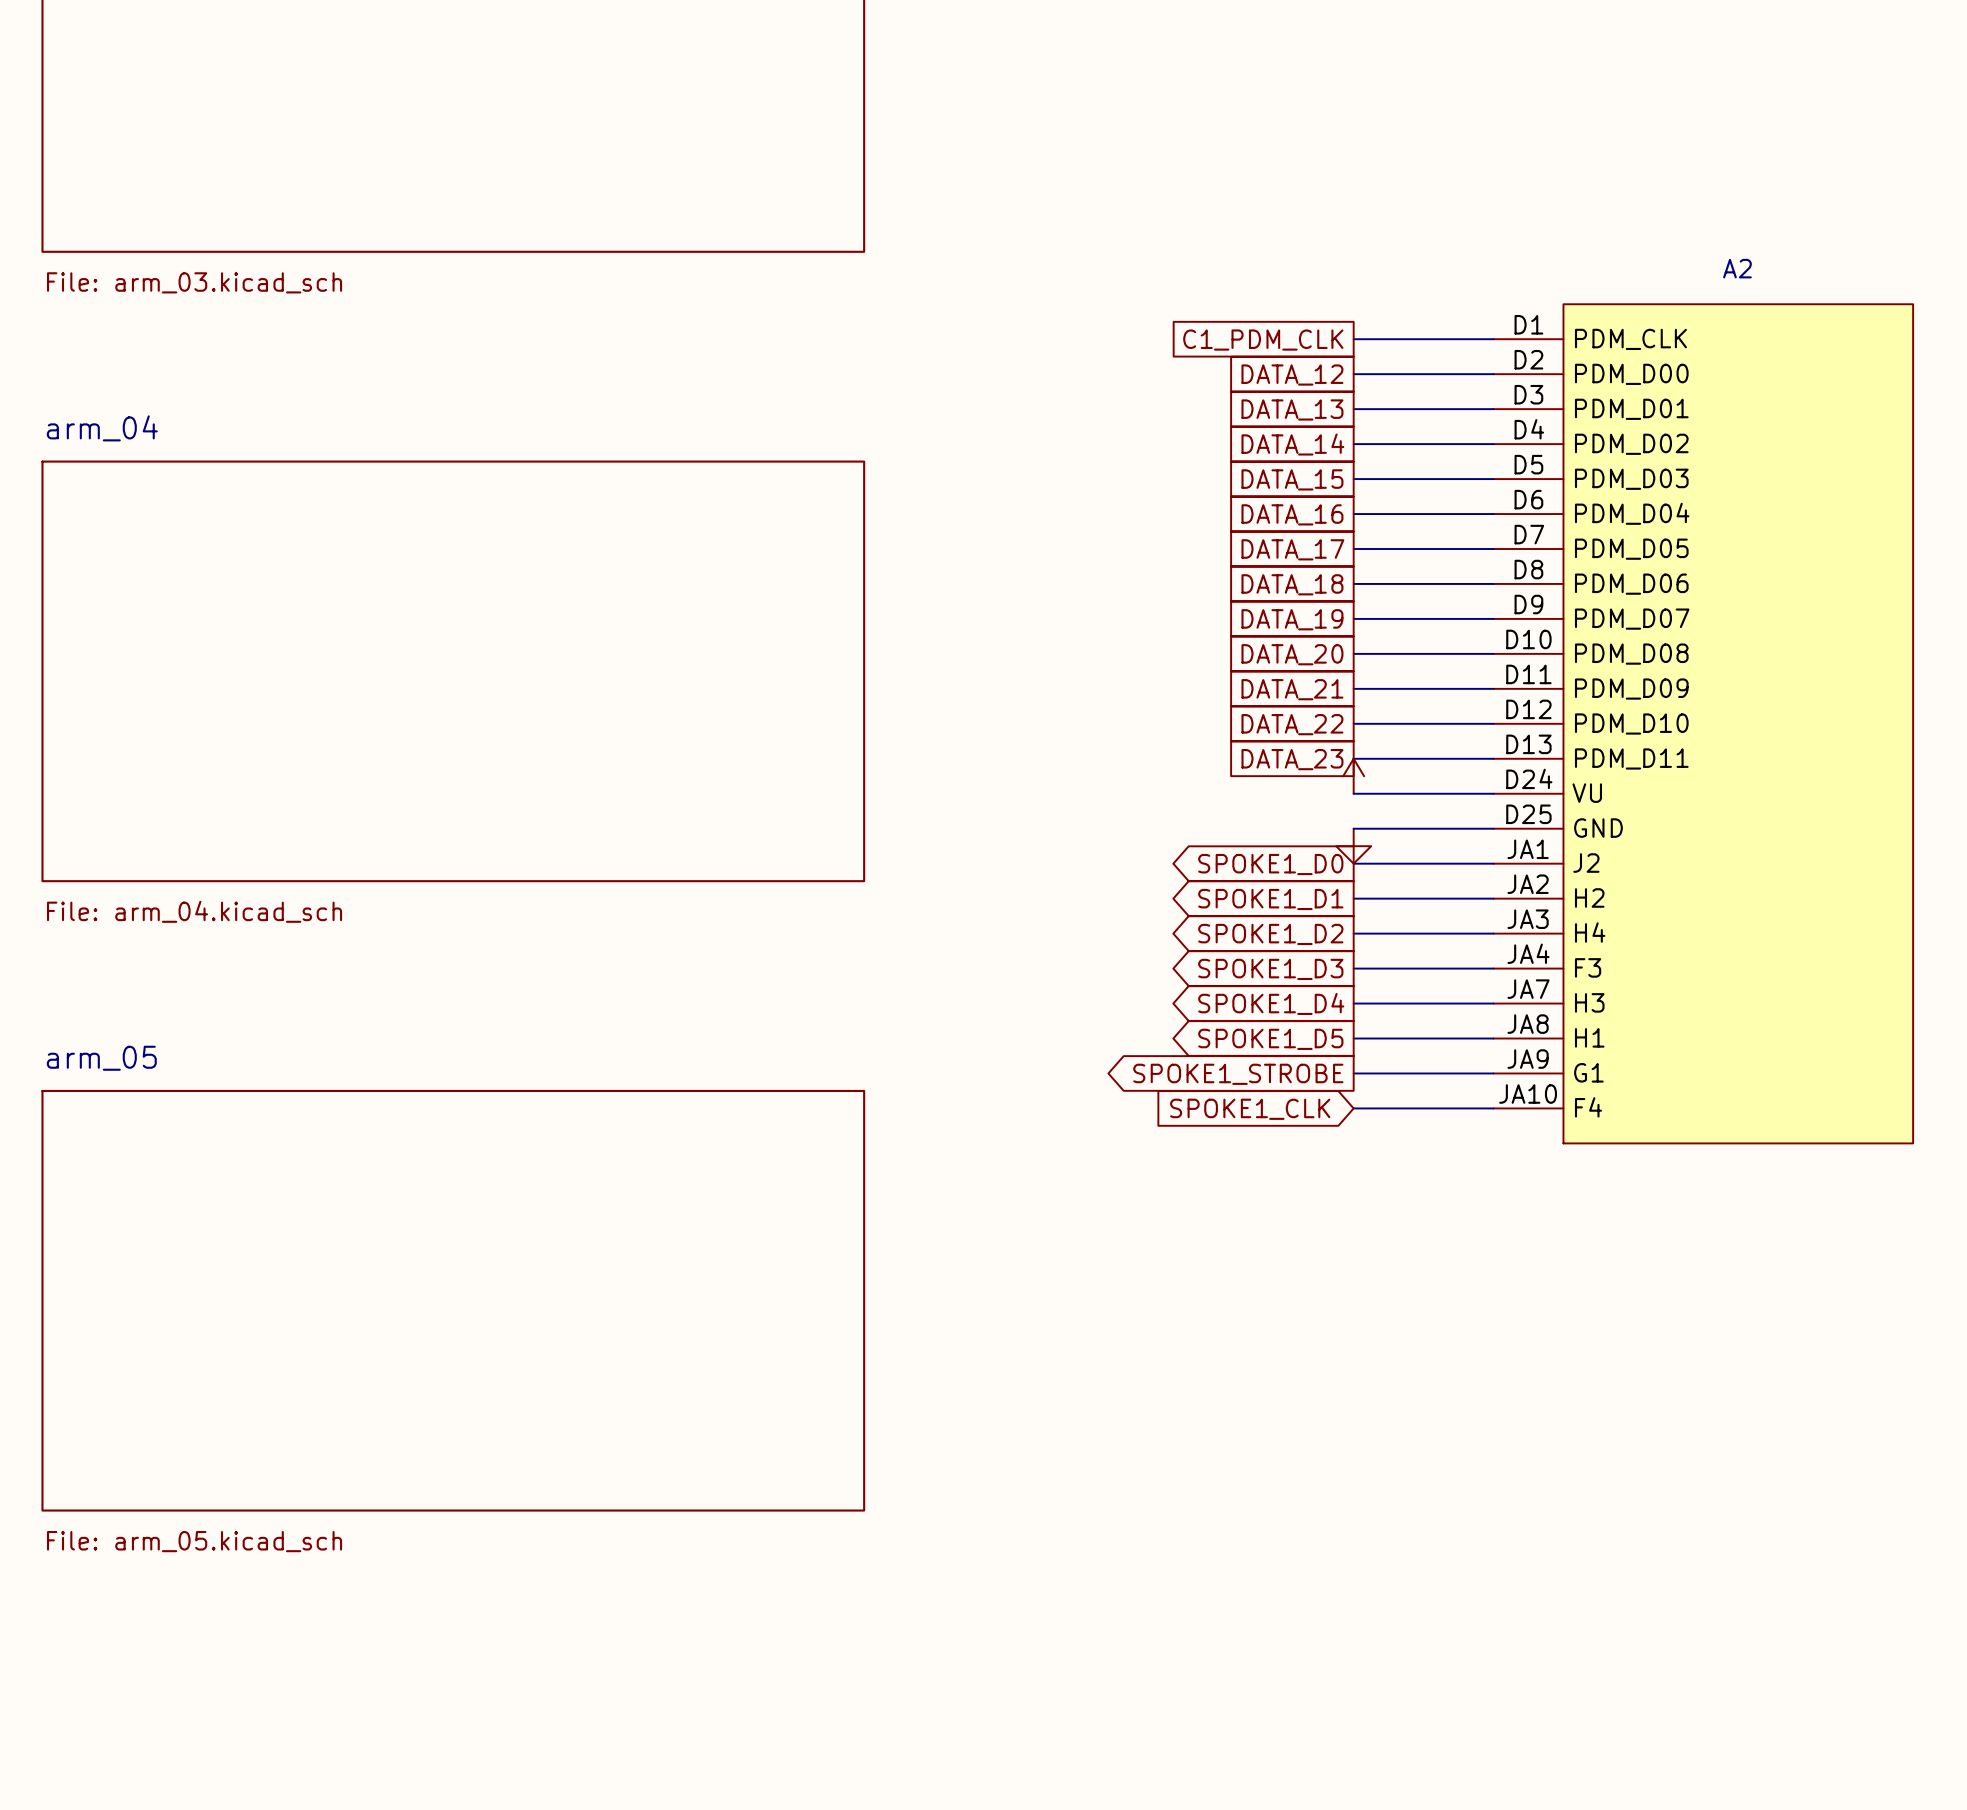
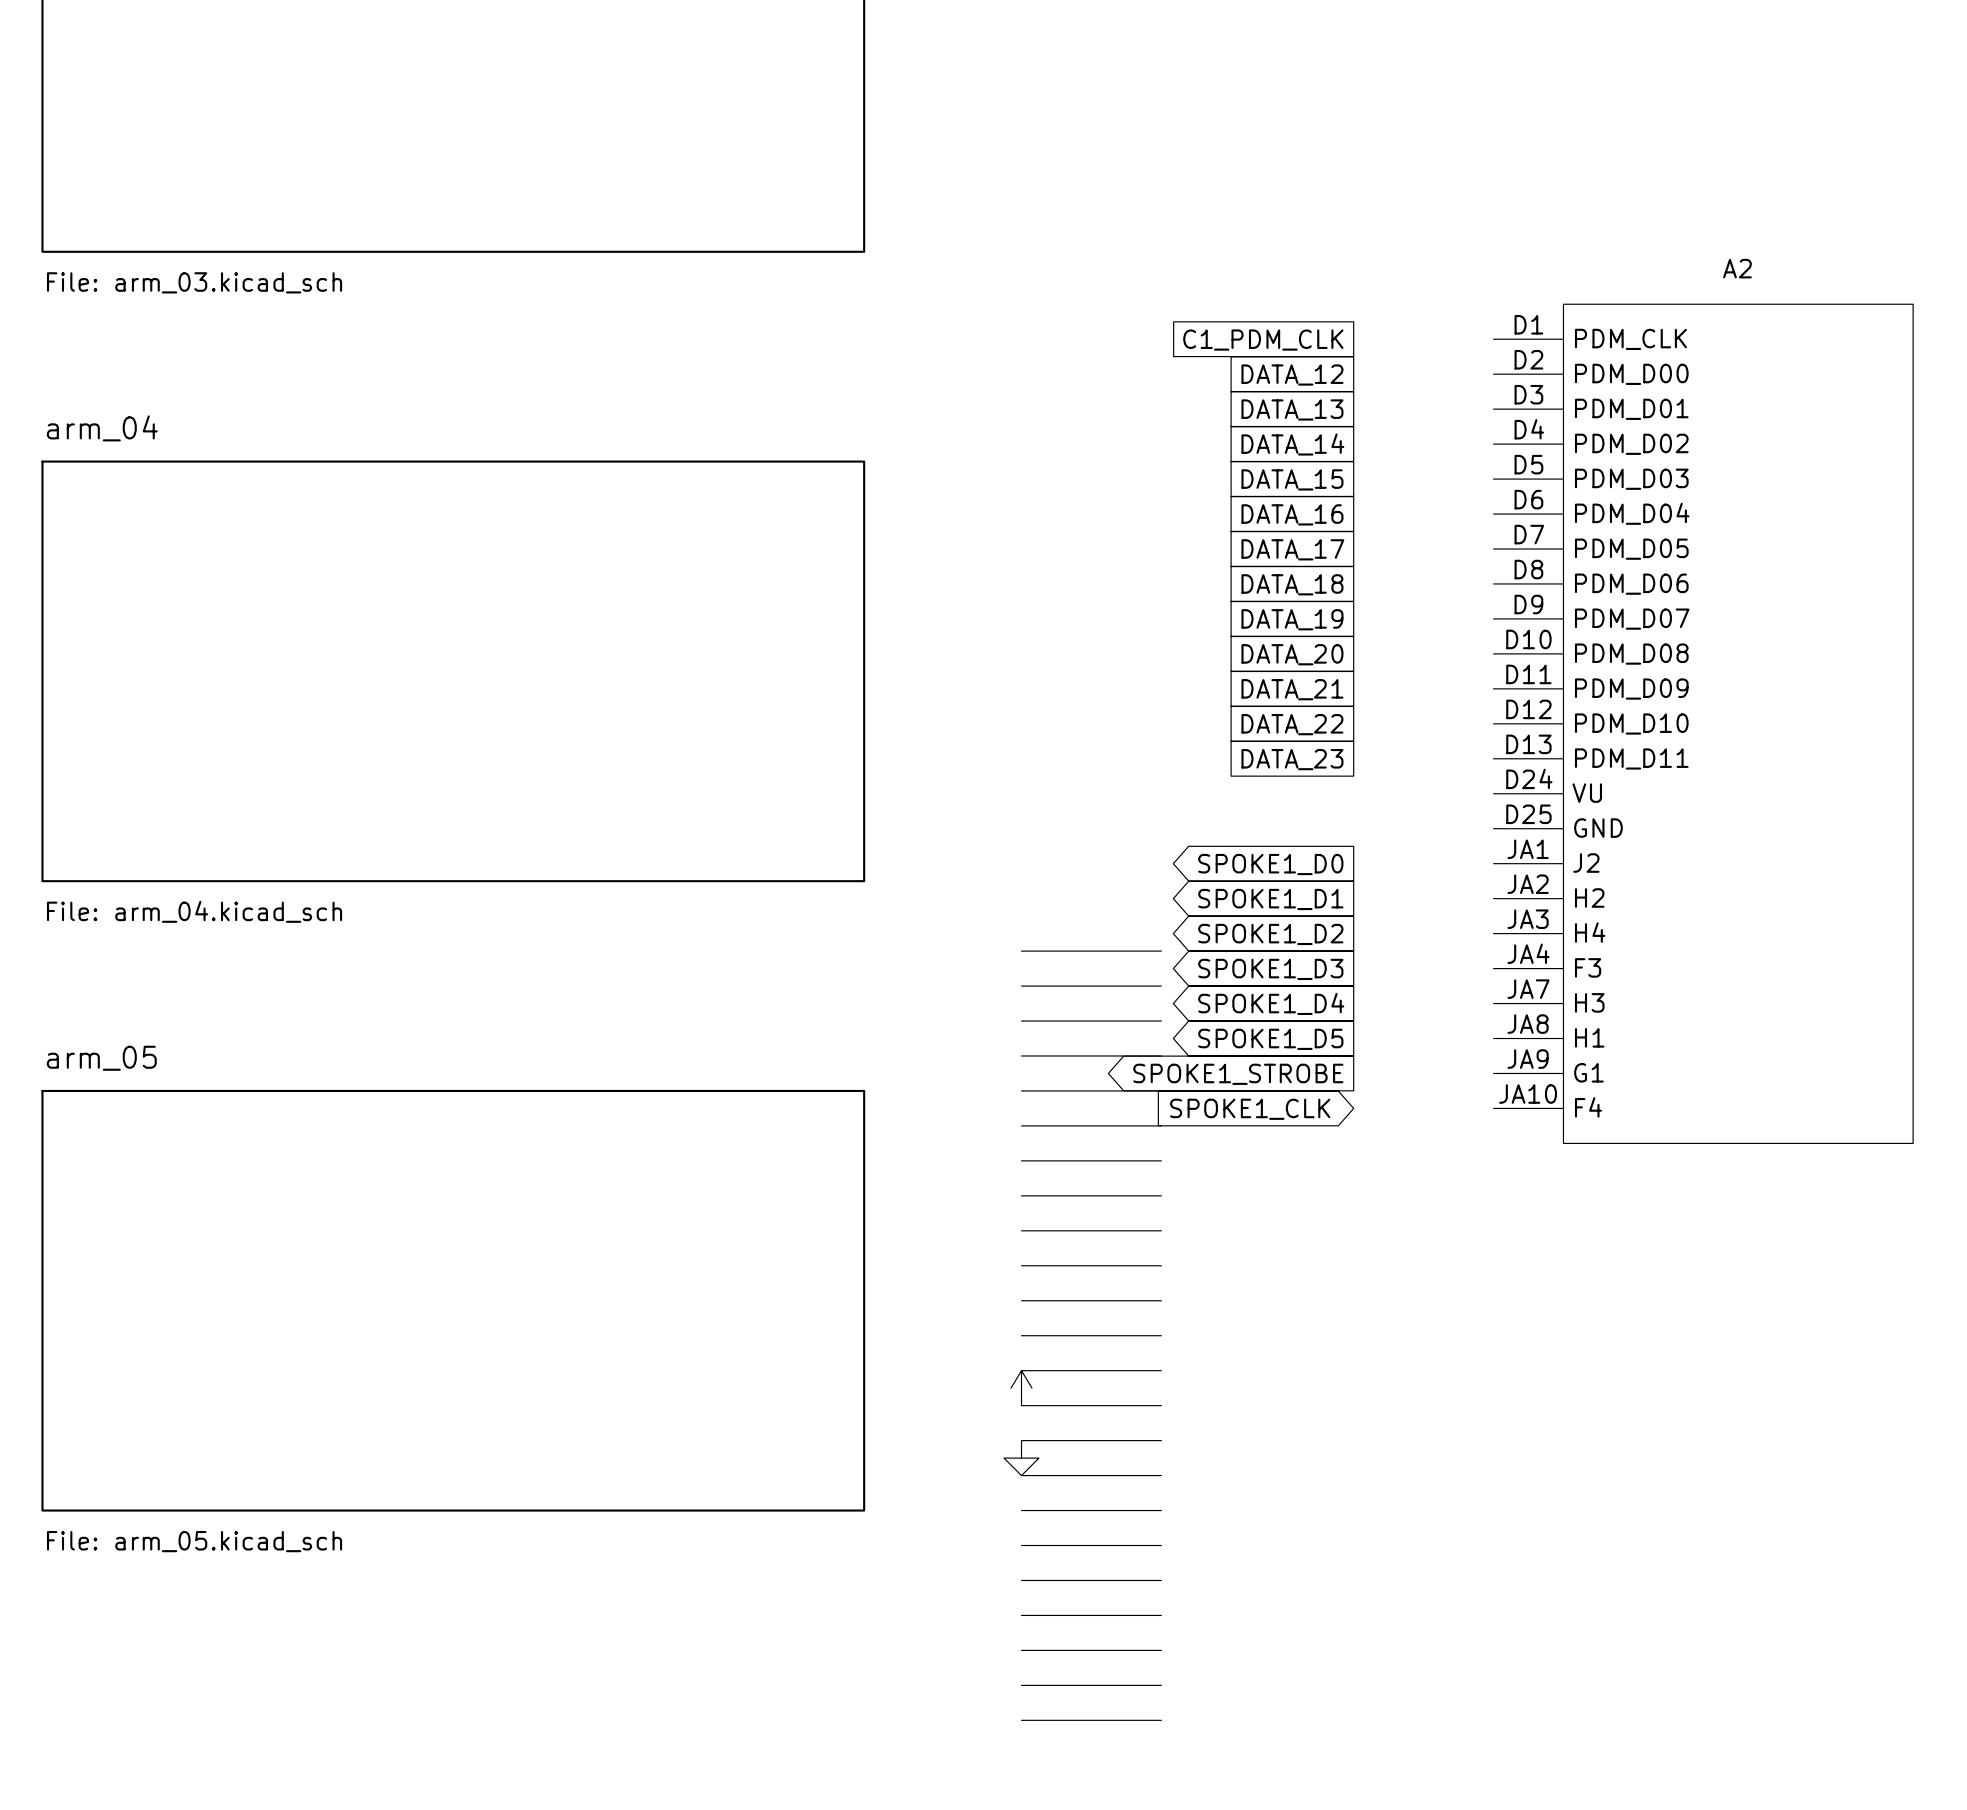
wire: (1353, 339) (1493, 339) -> none
wire: (1353, 374) (1493, 374) -> none
wire: (1353, 409) (1493, 409) -> none
wire: (1353, 444) (1493, 444) -> none
wire: (1353, 479) (1493, 479) -> none
wire: (1353, 514) (1493, 514) -> none
wire: (1353, 549) (1493, 549) -> none
wire: (1353, 583) (1493, 583) -> none
wire: (1353, 618) (1493, 618) -> none
wire: (1353, 653) (1493, 653) -> none
wire: (1353, 688) (1493, 688) -> none
wire: (1353, 723) (1493, 723) -> none
wire: (1353, 758) (1493, 758) -> none
power symbol: (1353, 776) -> none
wire: (1353, 793) (1493, 793) -> none
wire: (1353, 828) (1493, 828) -> none
power symbol: (1353, 846) -> none
wire: (1353, 863) (1493, 863) -> (1021, 951) (1161, 951)
wire: (1353, 898) (1493, 898) -> (1021, 986) (1161, 986)
wire: (1353, 933) (1493, 933) -> (1021, 1021) (1161, 1021)
wire: (1353, 968) (1493, 968) -> (1021, 1055) (1161, 1055)
wire: (1353, 1003) (1493, 1003) -> (1021, 1090) (1161, 1090)
wire: (1353, 1038) (1493, 1038) -> (1021, 1125) (1161, 1125)
wire: (1353, 1073) (1493, 1073) -> (1021, 1160) (1161, 1160)
wire: (1353, 1108) (1493, 1108) -> (1021, 1195) (1161, 1195)
wire: none -> (1021, 1230) (1161, 1230)
wire: none -> (1021, 1265) (1161, 1265)
wire: none -> (1021, 1300) (1161, 1300)
wire: none -> (1021, 1335) (1161, 1335)
wire: none -> (1021, 1370) (1161, 1370)
power symbol: none -> (1021, 1388)
wire: none -> (1021, 1405) (1161, 1405)
wire: none -> (1021, 1440) (1161, 1440)
power symbol: none -> (1021, 1458)
wire: none -> (1021, 1475) (1161, 1475)
wire: none -> (1021, 1510) (1161, 1510)
wire: none -> (1021, 1545) (1161, 1545)
wire: none -> (1021, 1580) (1161, 1580)
wire: none -> (1021, 1615) (1161, 1615)
wire: none -> (1021, 1650) (1161, 1650)
wire: none -> (1021, 1685) (1161, 1685)
wire: none -> (1021, 1720) (1161, 1720)

